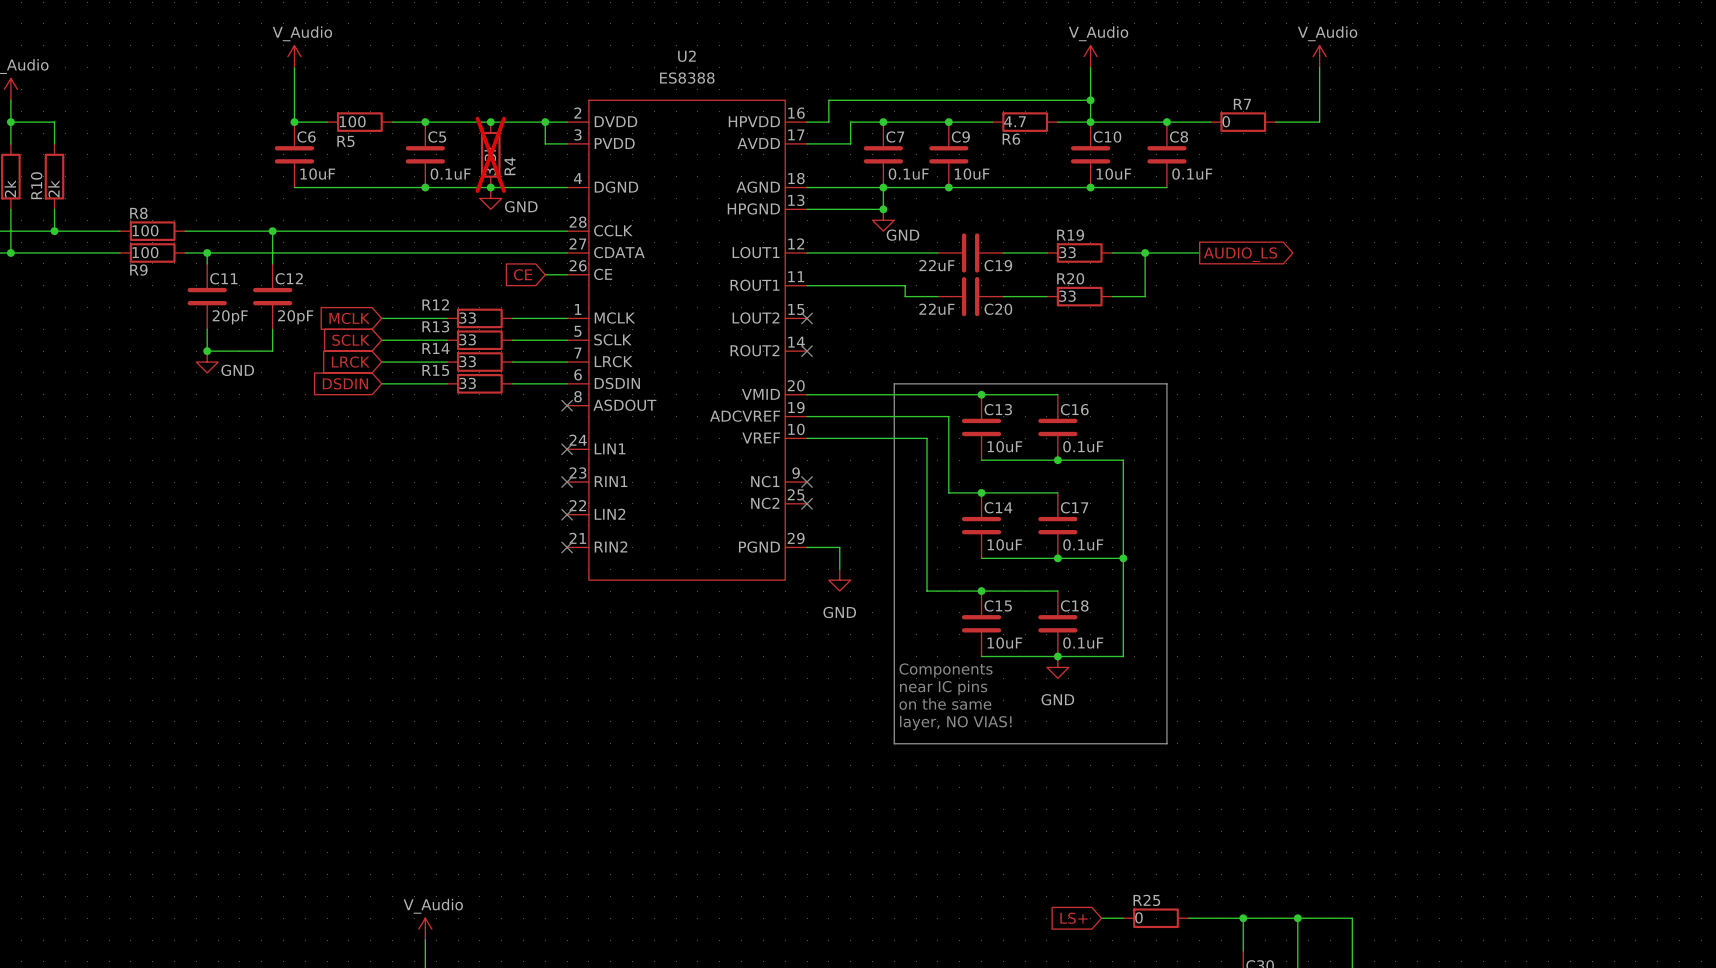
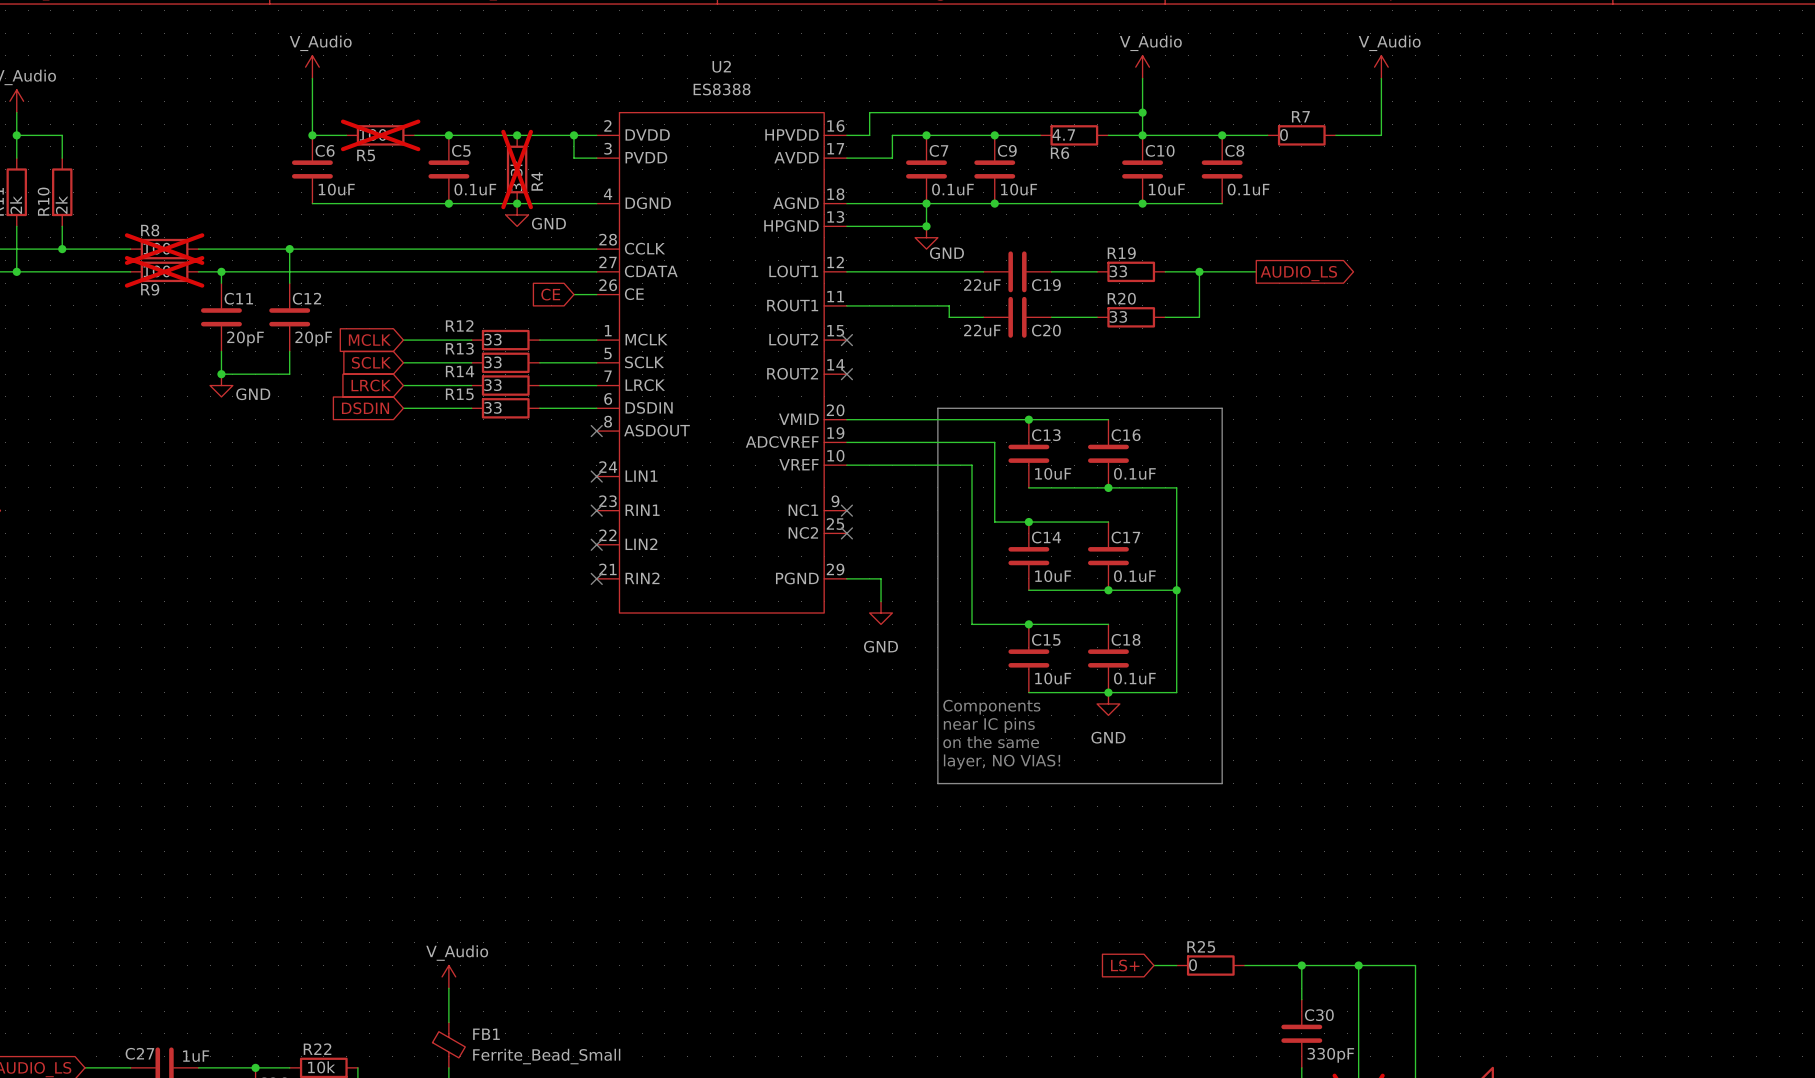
R5 do-not-place cross: none -> (380, 135)
R8 do-not-place cross: none -> (164, 249)
R9 do-not-place cross: none -> (164, 271)

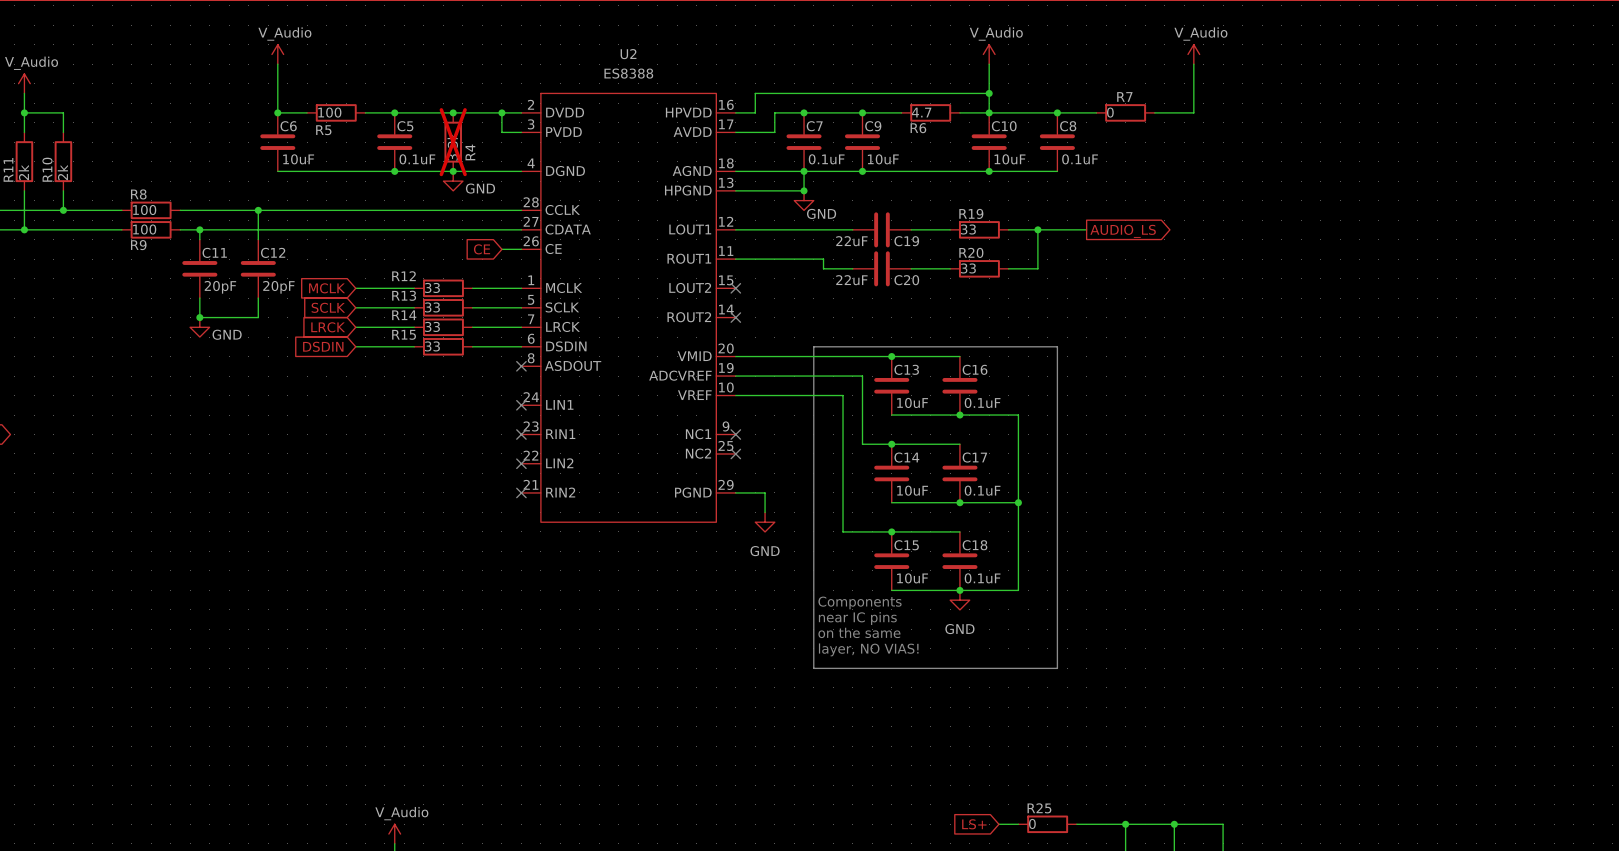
R5 do-not-place cross: (380, 135) -> none
R8 do-not-place cross: (164, 249) -> none
R9 do-not-place cross: (164, 271) -> none

